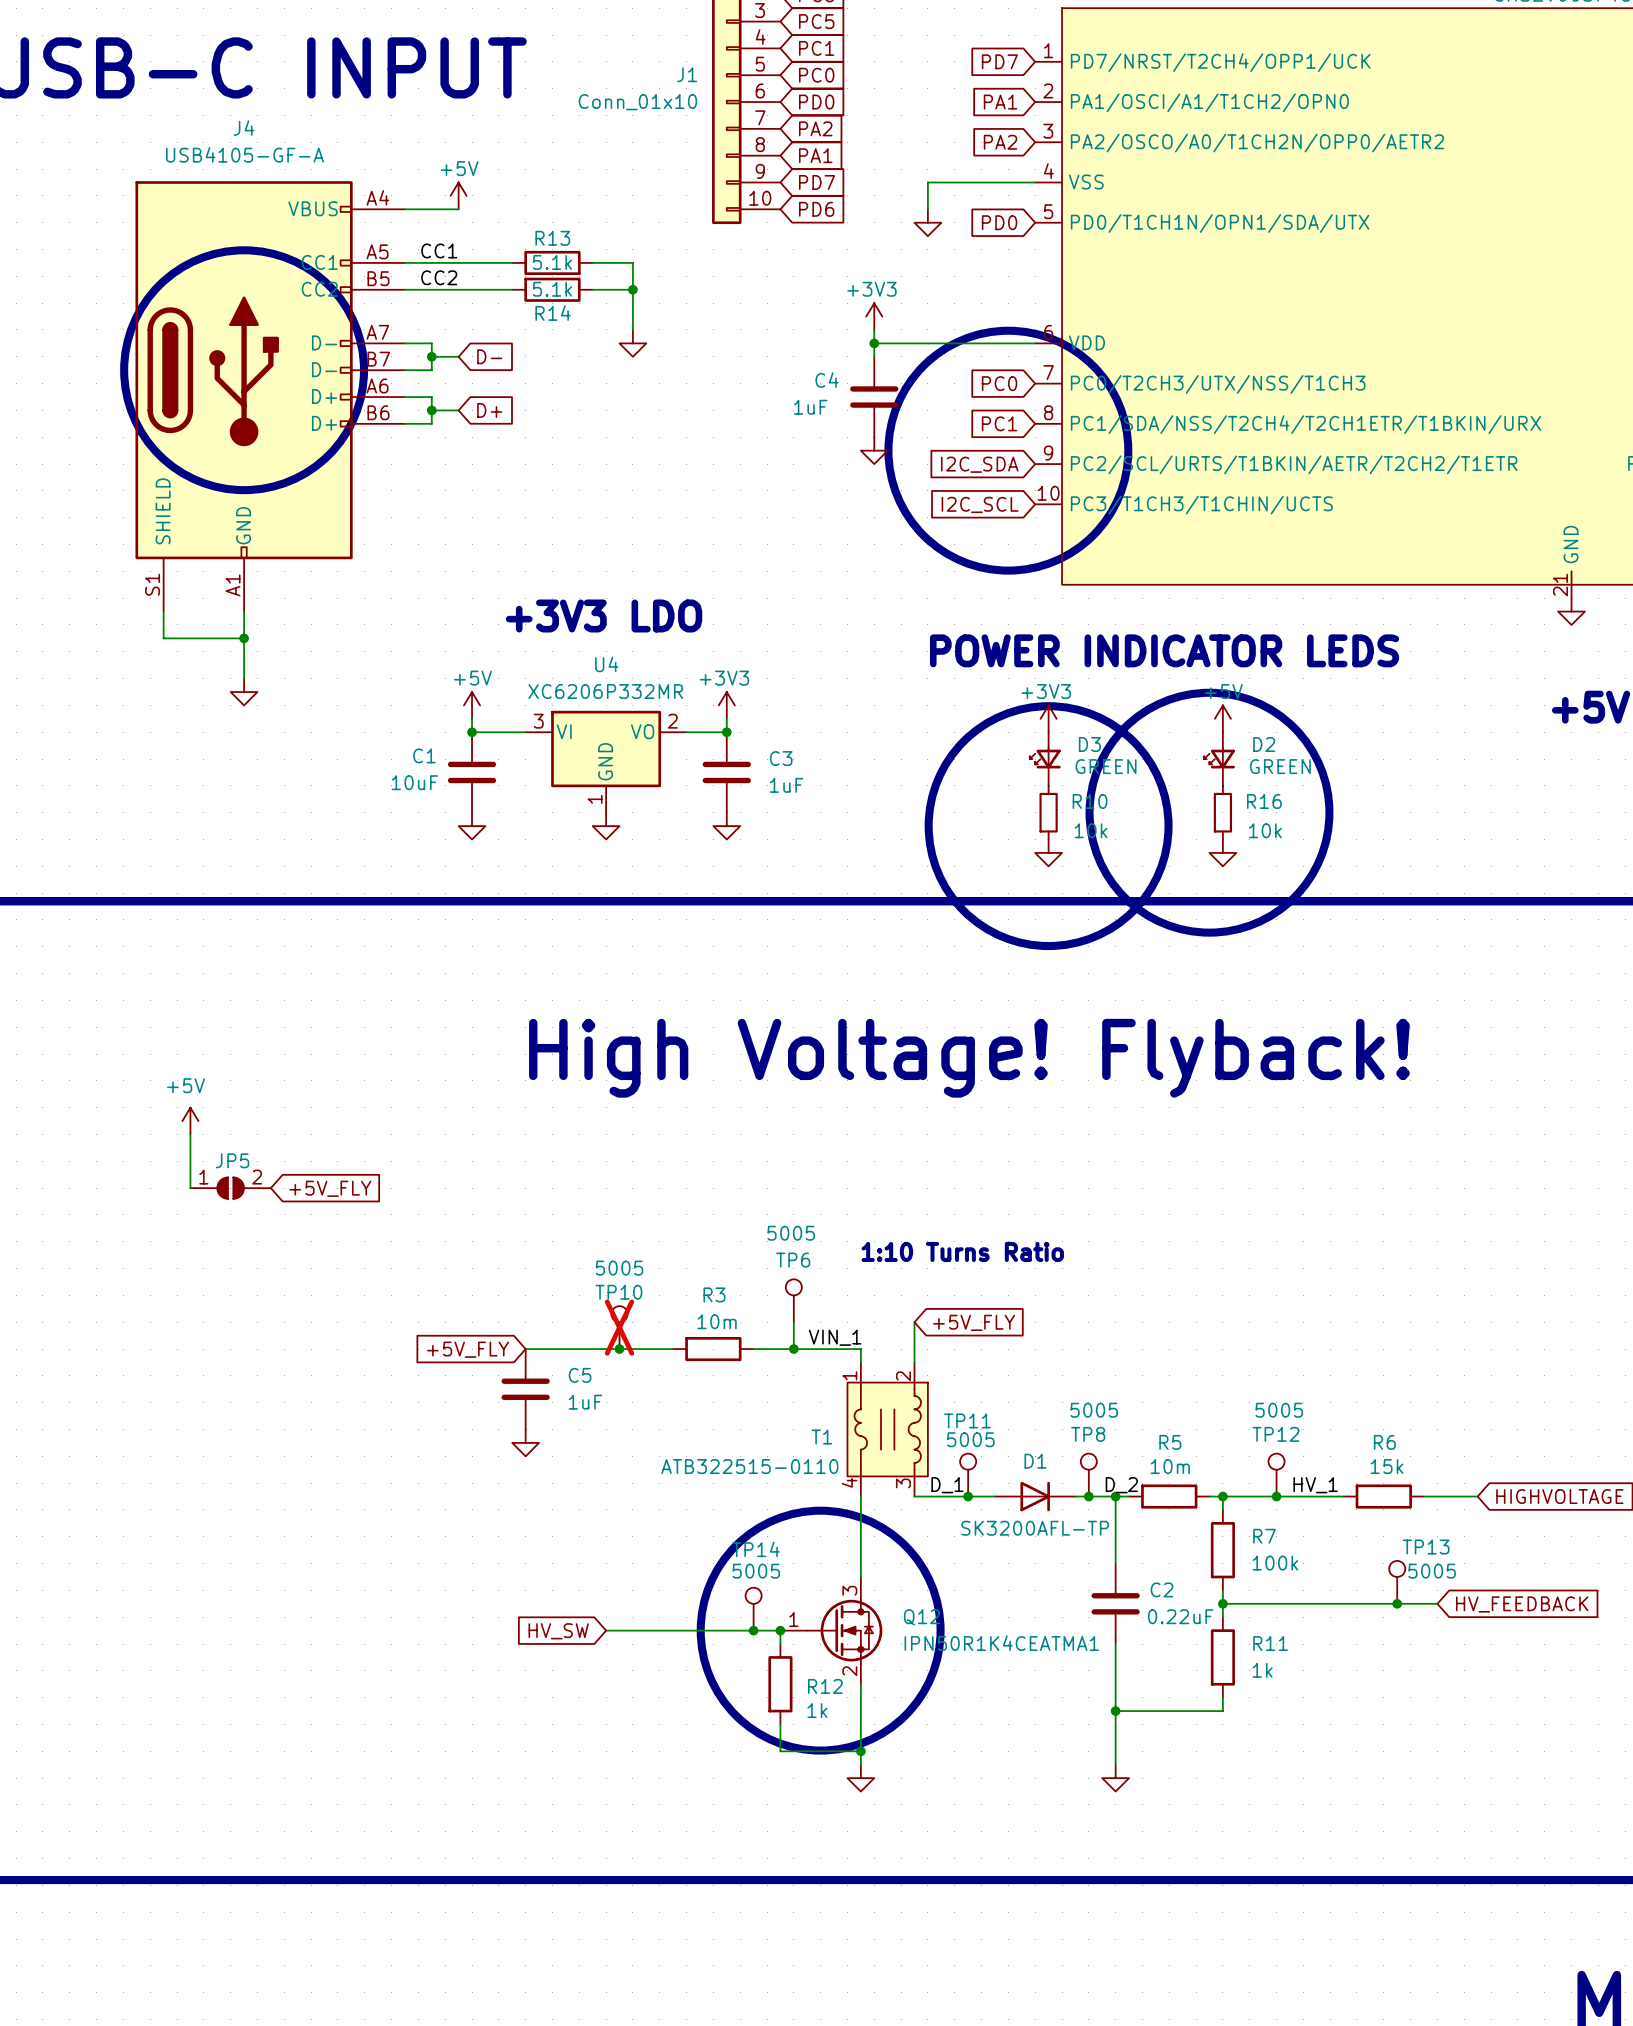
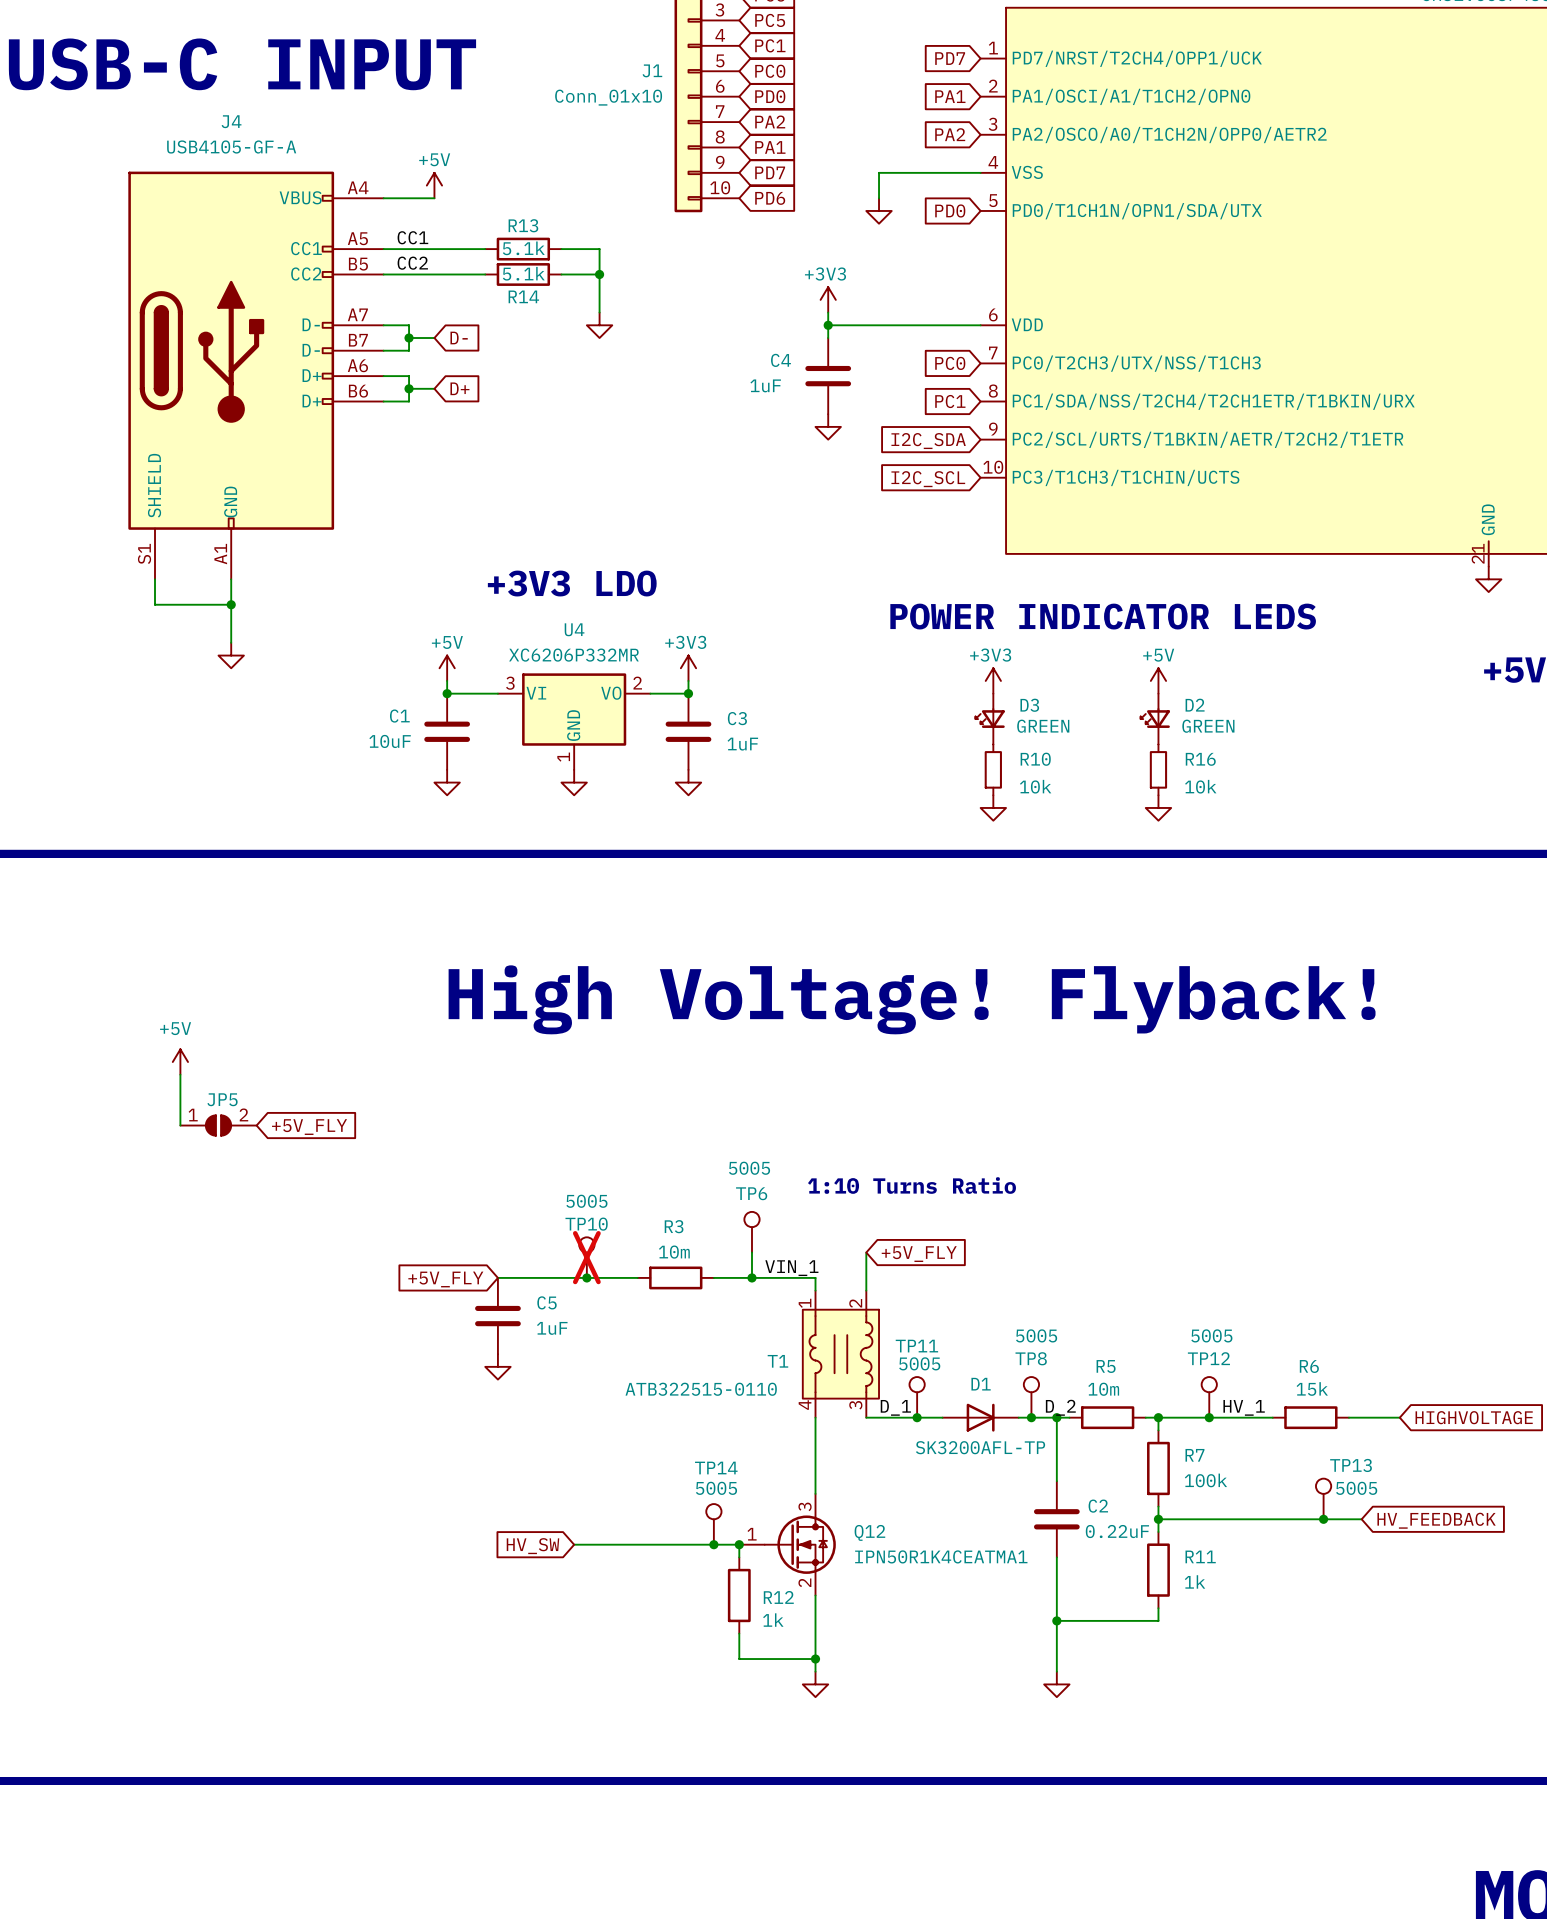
drawing: [120, 246, 369, 495] -> none
drawing: [884, 326, 1133, 575] -> none
drawing: [924, 688, 1334, 951] -> none
drawing: [696, 1506, 945, 1755] -> none

